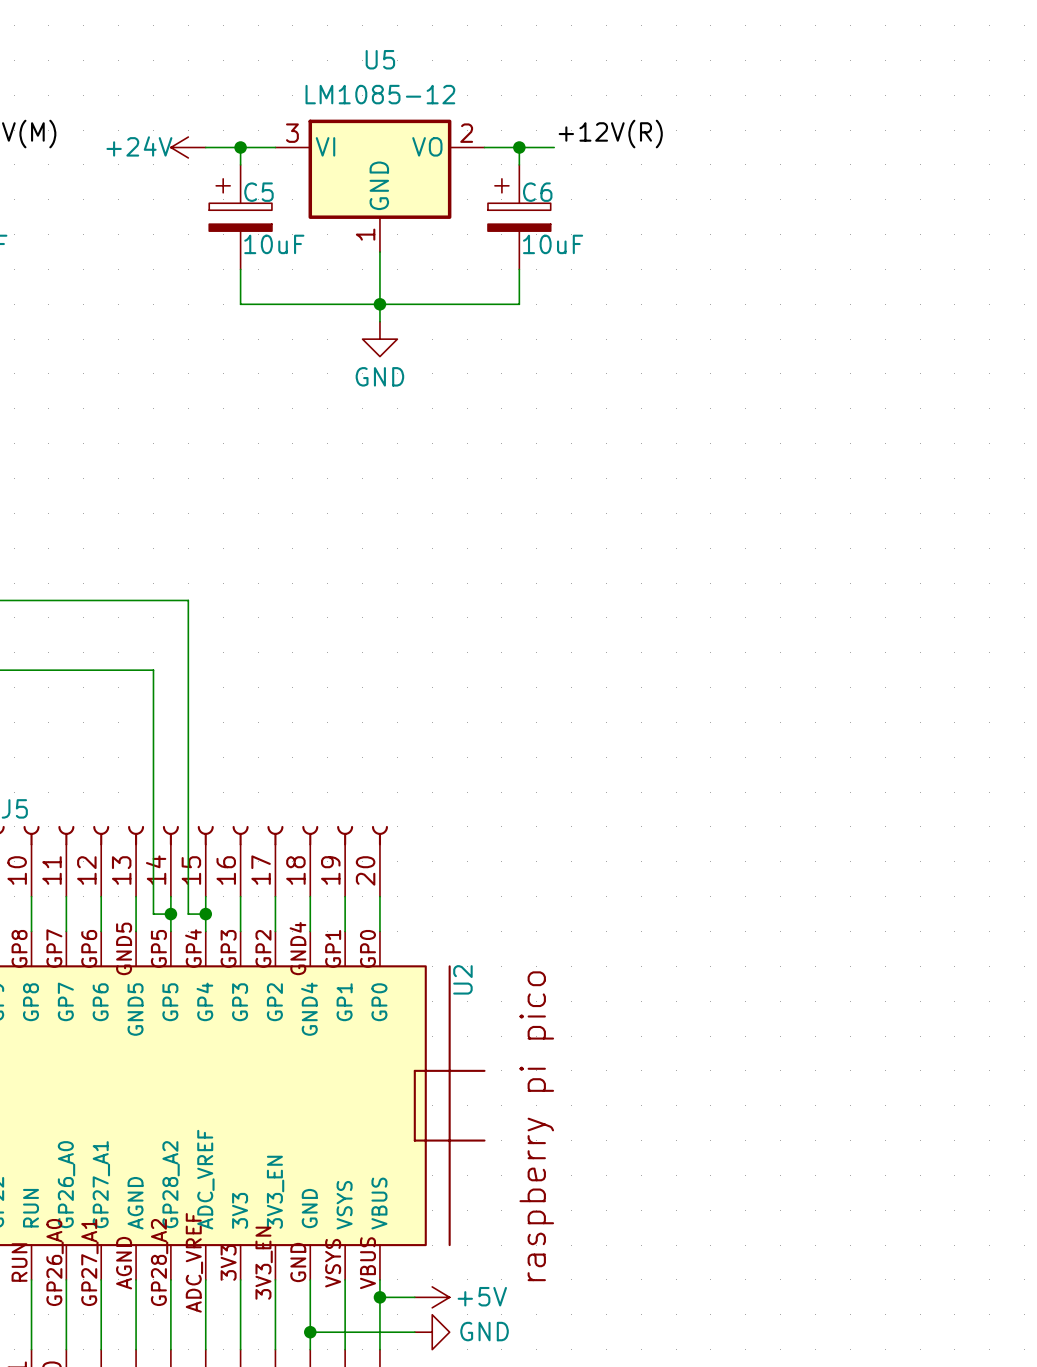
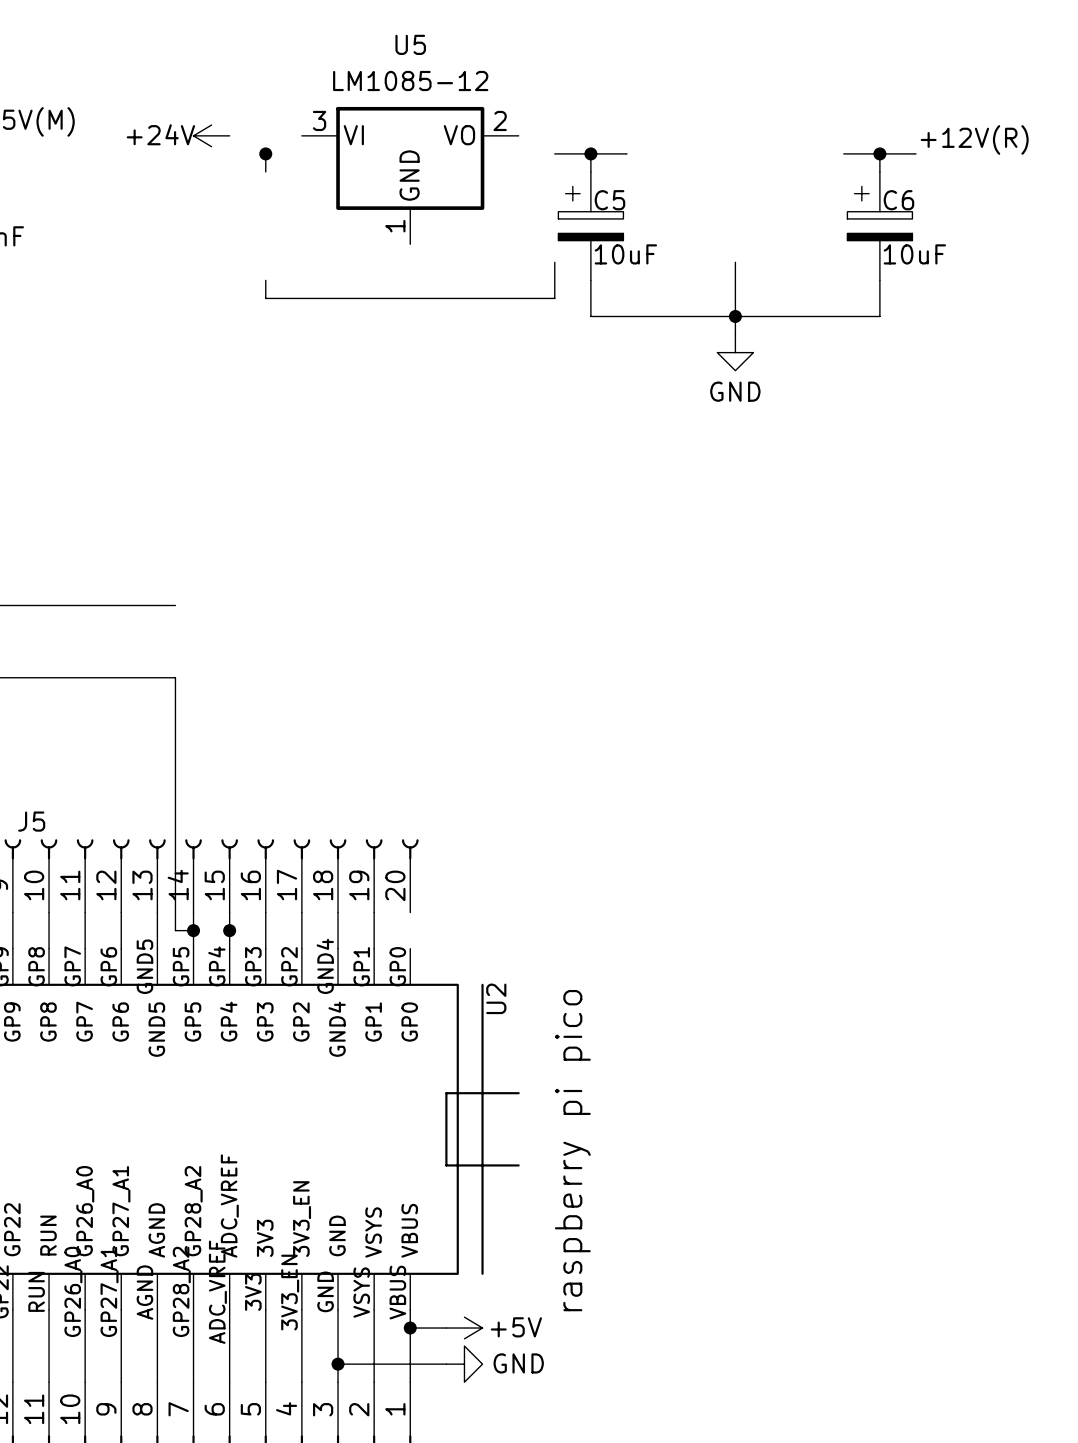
label position: +12V(R) (610, 134) -> +12V(R) (974, 139)
wire: (205, 147) (275, 147) -> none
junction position: (240, 147) -> (265, 153)
wire: (484, 147) (554, 147) -> (843, 153) (916, 153)
wire: (519, 147) (519, 164) -> (627, 153) (554, 153)
junction position: (519, 147) -> (590, 153)
wire: none -> (879, 153) (879, 171)
junction: none -> (879, 153)
C5 position: (240, 217) -> (590, 226)
C6 position: (519, 217) -> (879, 226)
wire: (379, 252) (379, 321) -> (735, 262) (735, 334)
wire: (240, 269) (240, 286) -> (590, 153) (590, 171)
wire: none -> (590, 280) (590, 316) (879, 316) (879, 280)
junction: (379, 304) -> none
junction: none -> (735, 316)
power symbol position: GND (379, 339) -> GND (735, 352)
wire: (153, 600) (188, 600) (188, 914) (205, 914) -> none
wire: (379, 896) (379, 931) -> none

